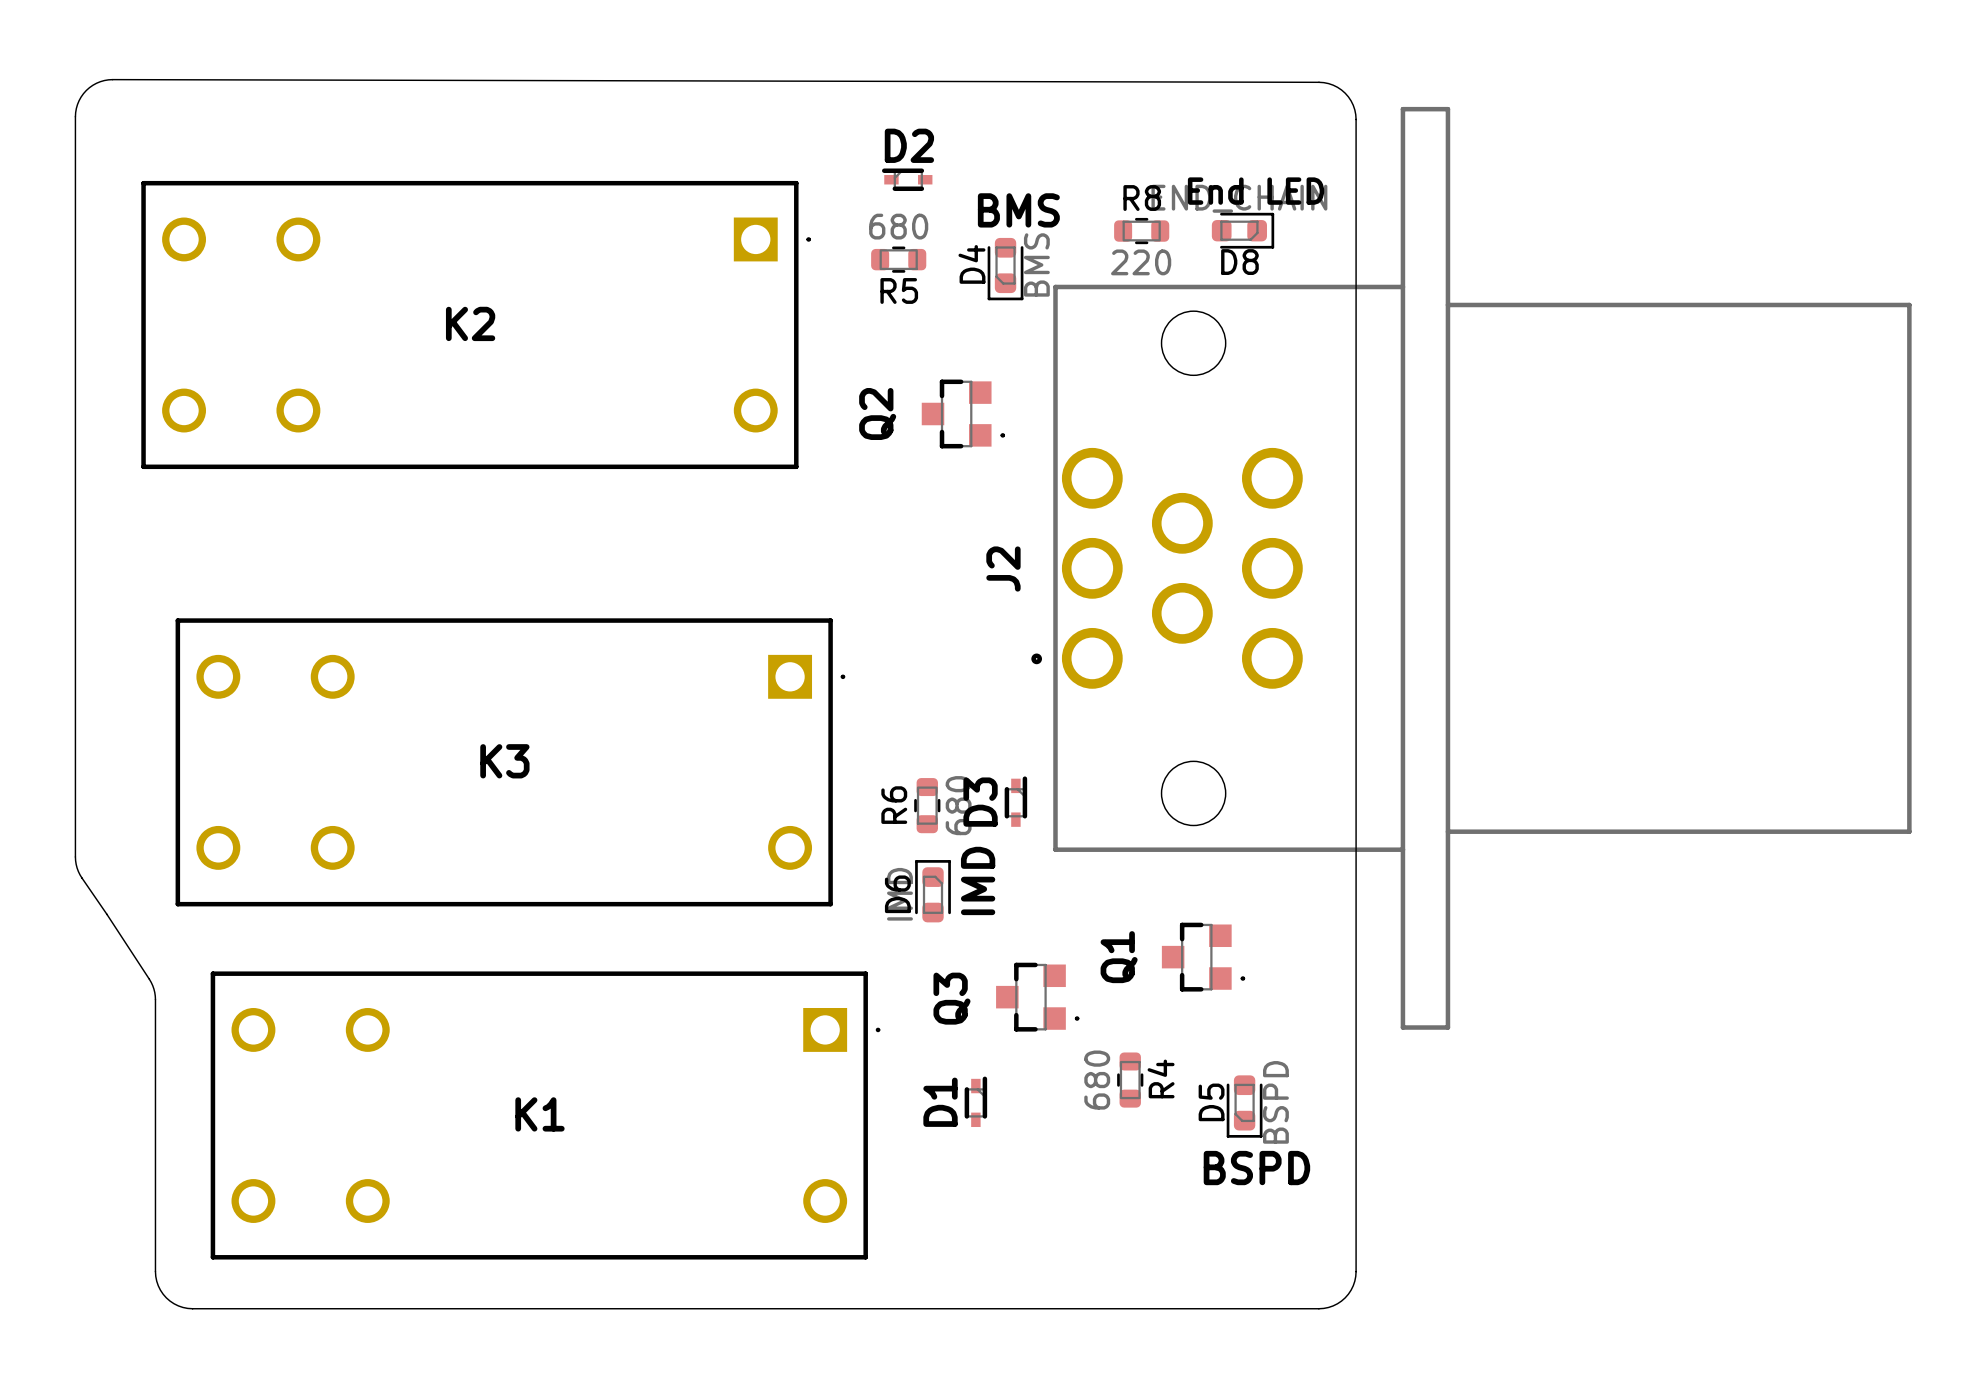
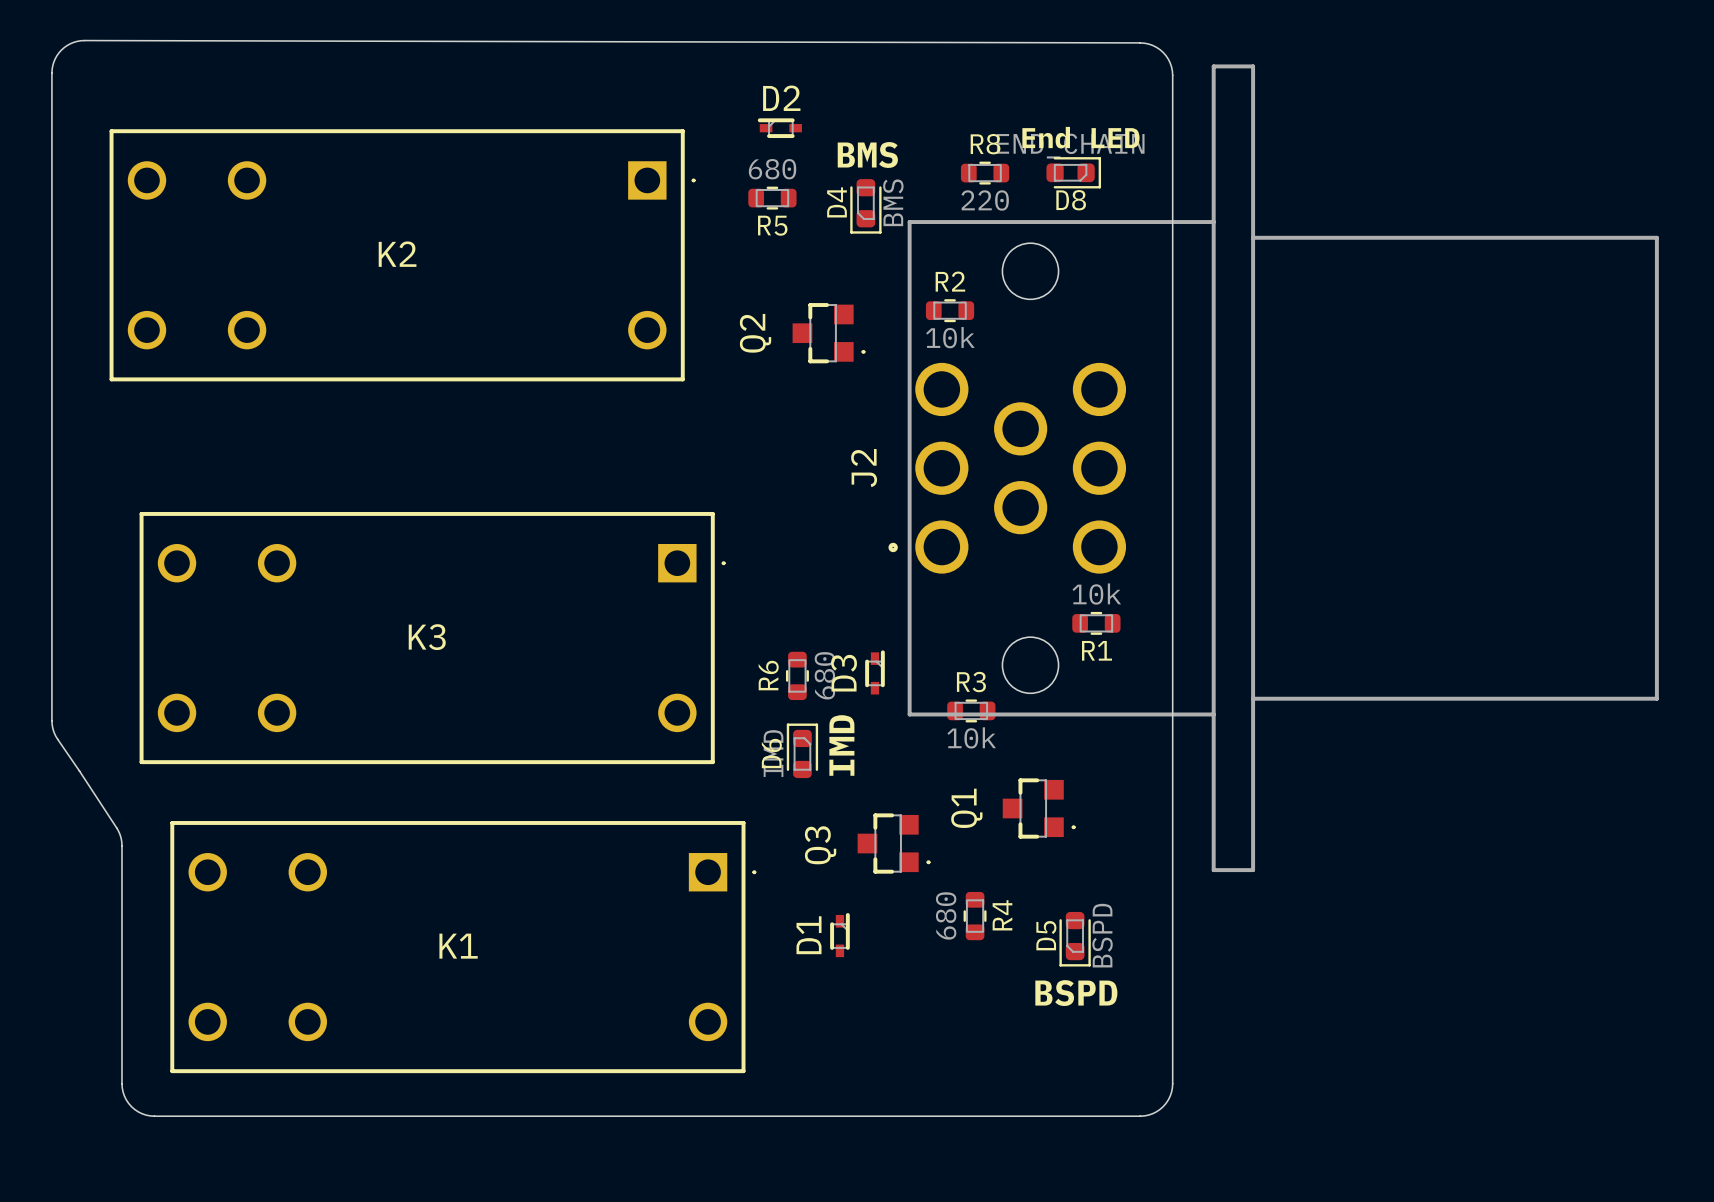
R2: none -> 10k (950, 310)
R1: none -> 10k (1096, 623)
R3: none -> 10k (971, 710)

